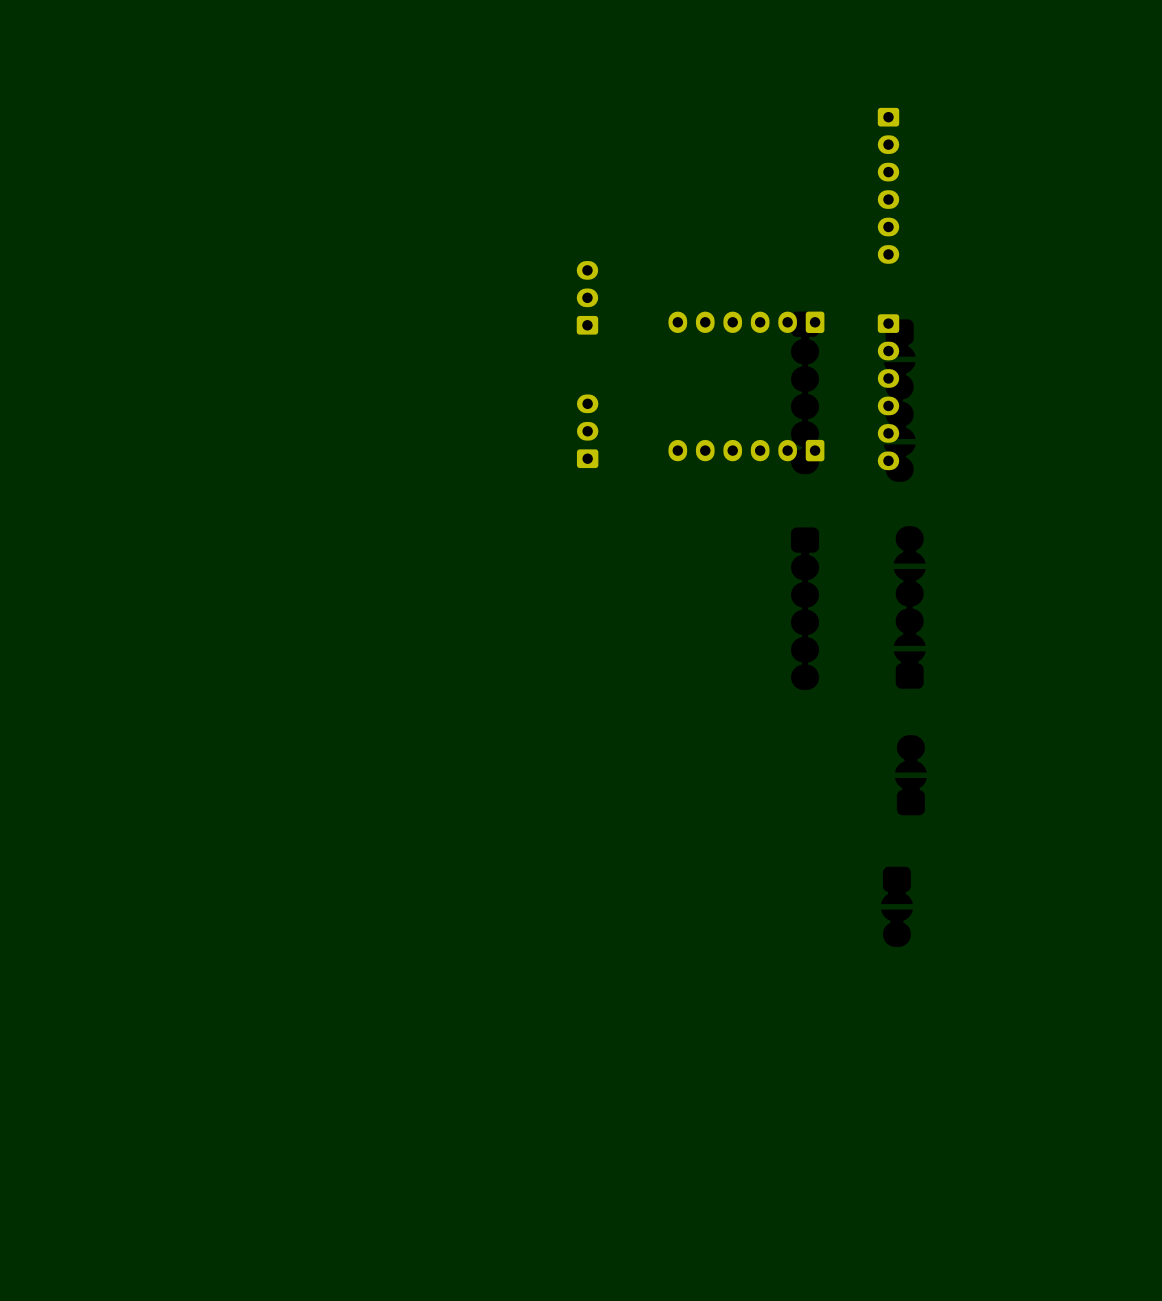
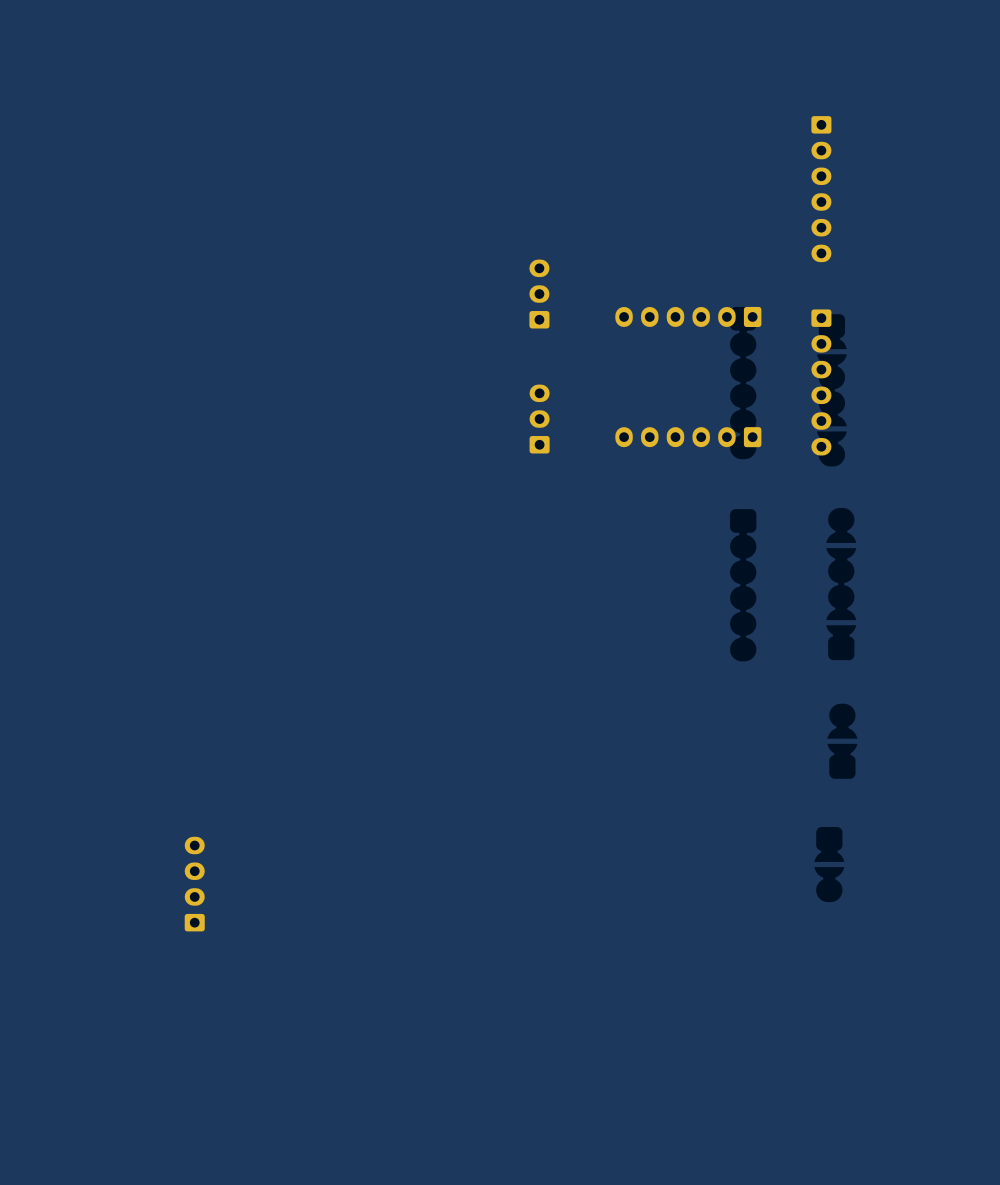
part: none -> (194, 884)

